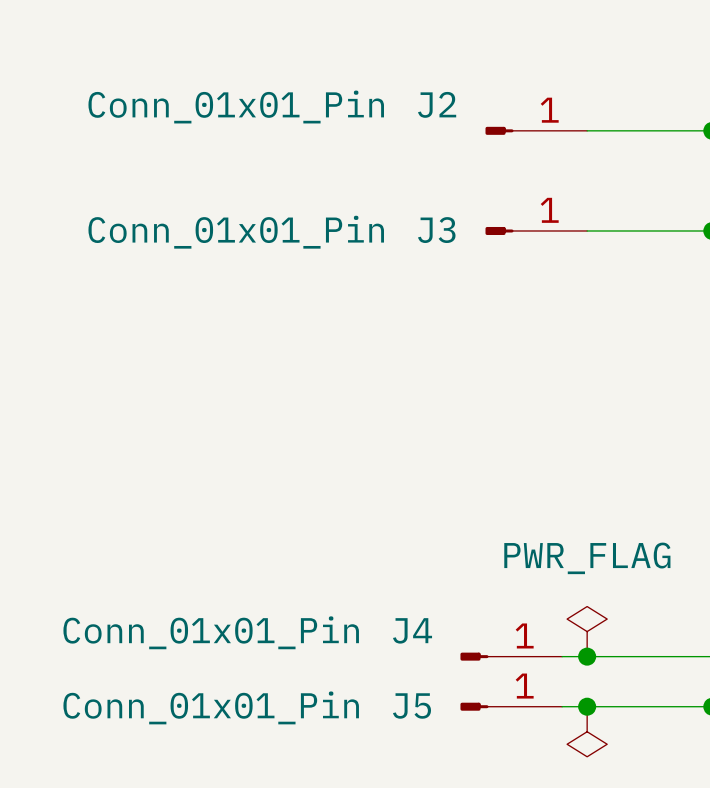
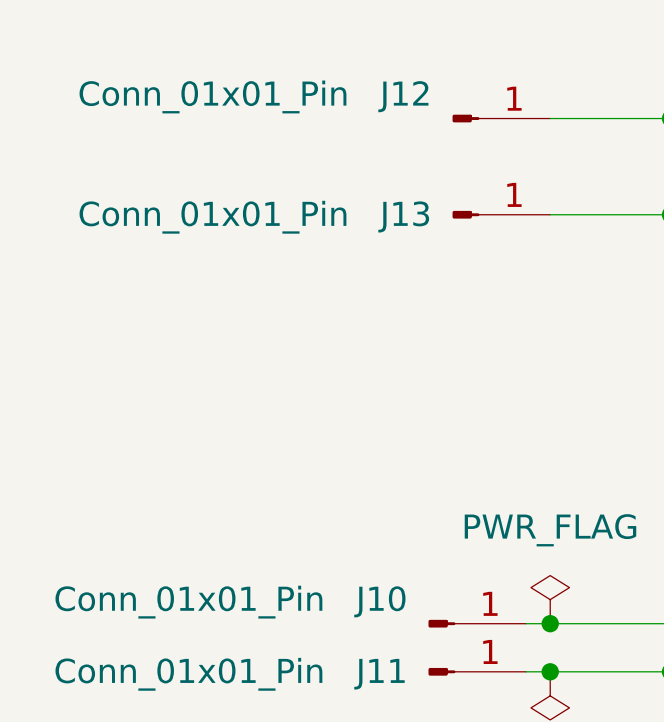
J2 name: J2 (437, 104) -> J12 (403, 96)
J3 name: J3 (436, 230) -> J13 (403, 216)
J4 name: J4 (412, 630) -> J10 (379, 601)
J5 name: J5 (412, 705) -> J11 (379, 674)

